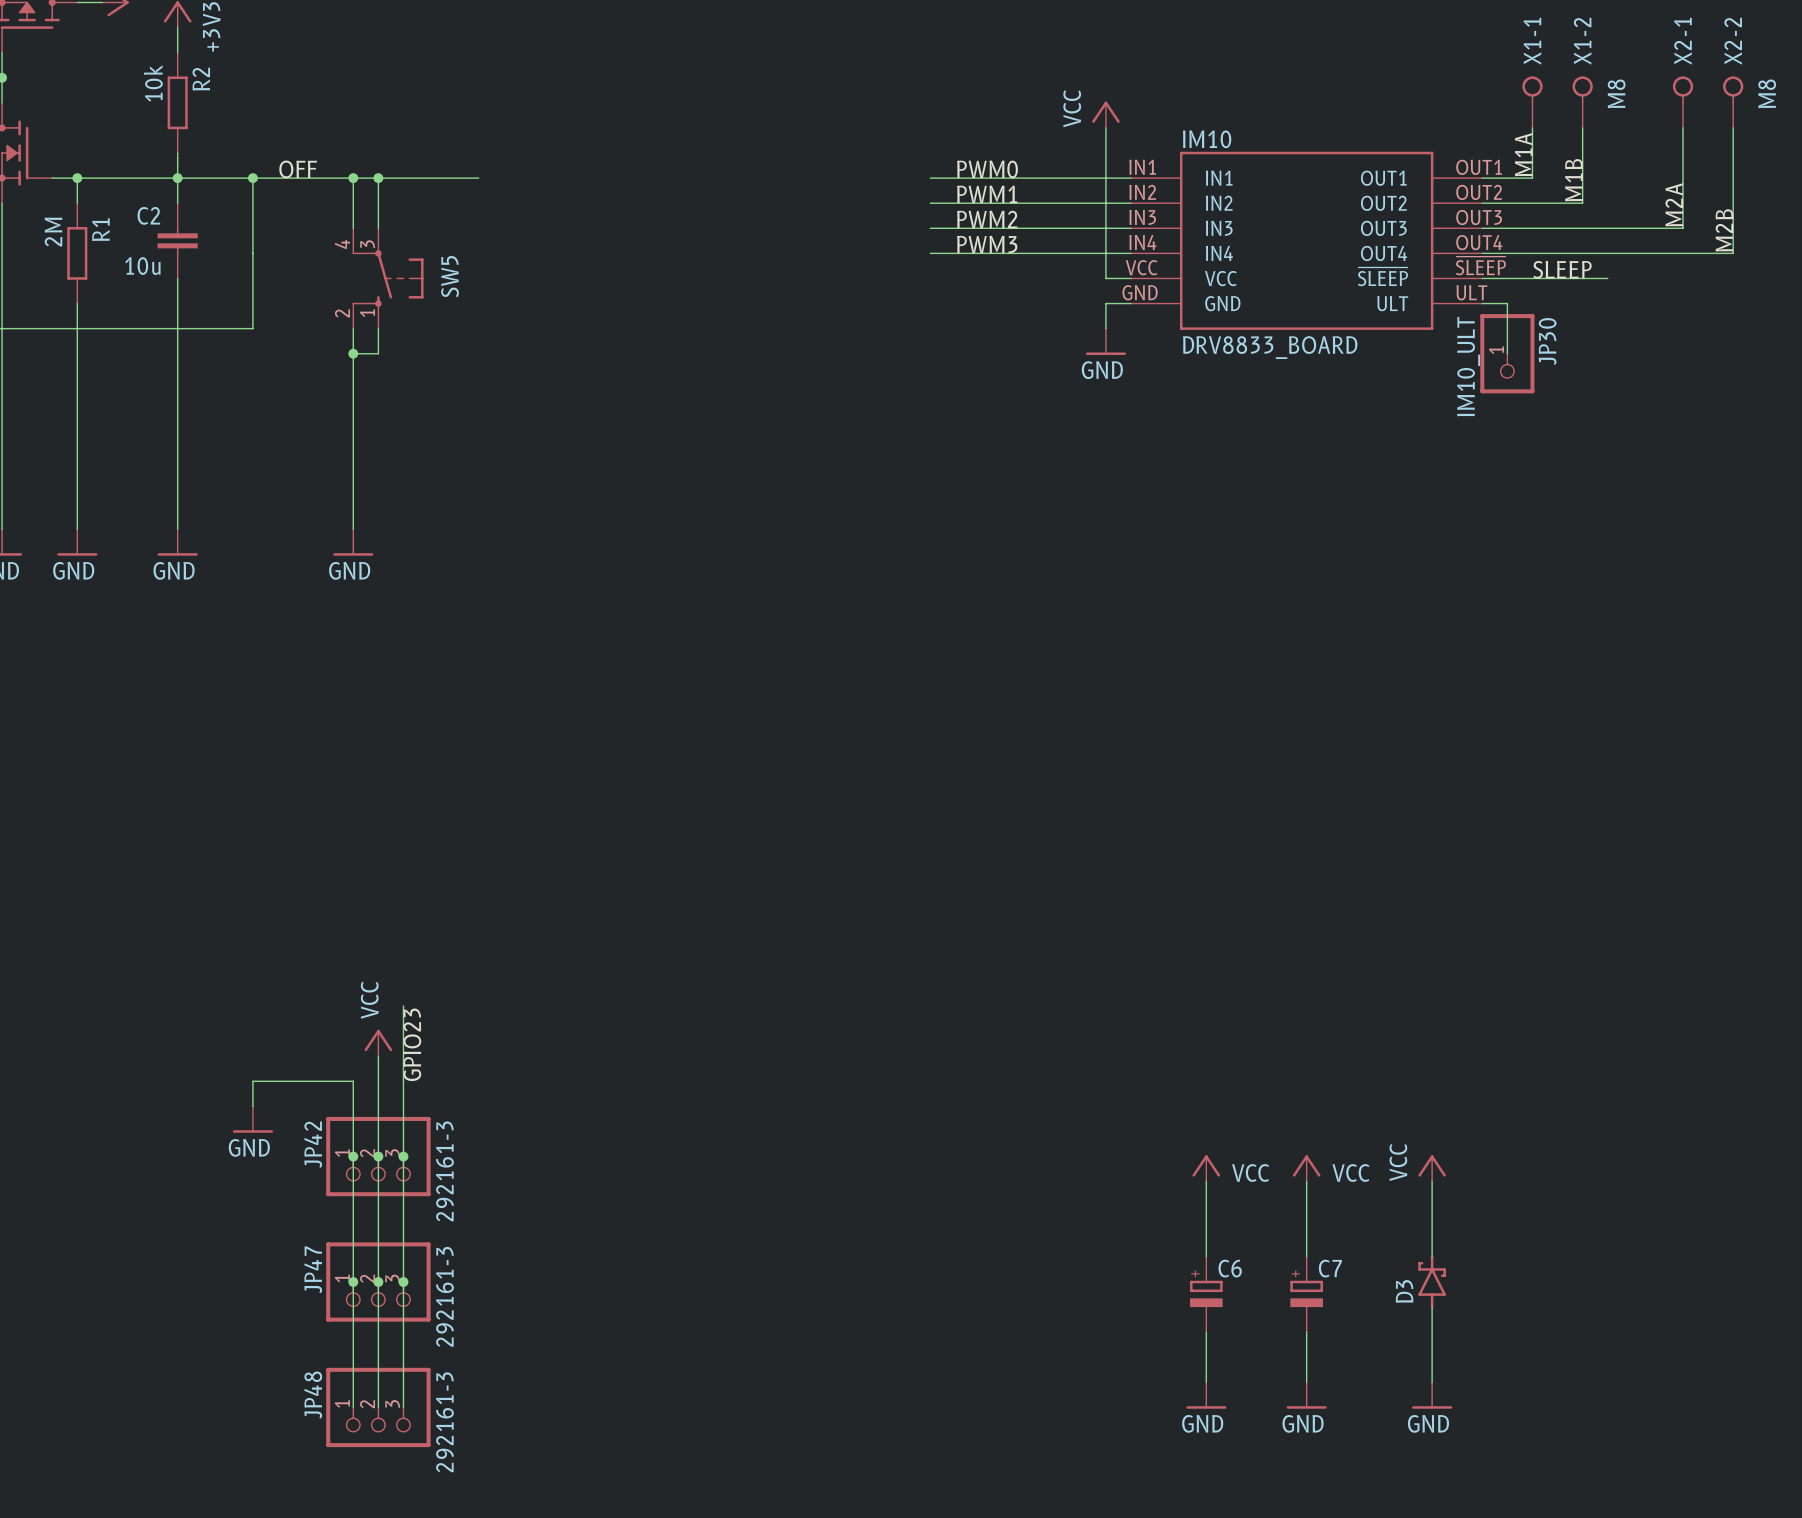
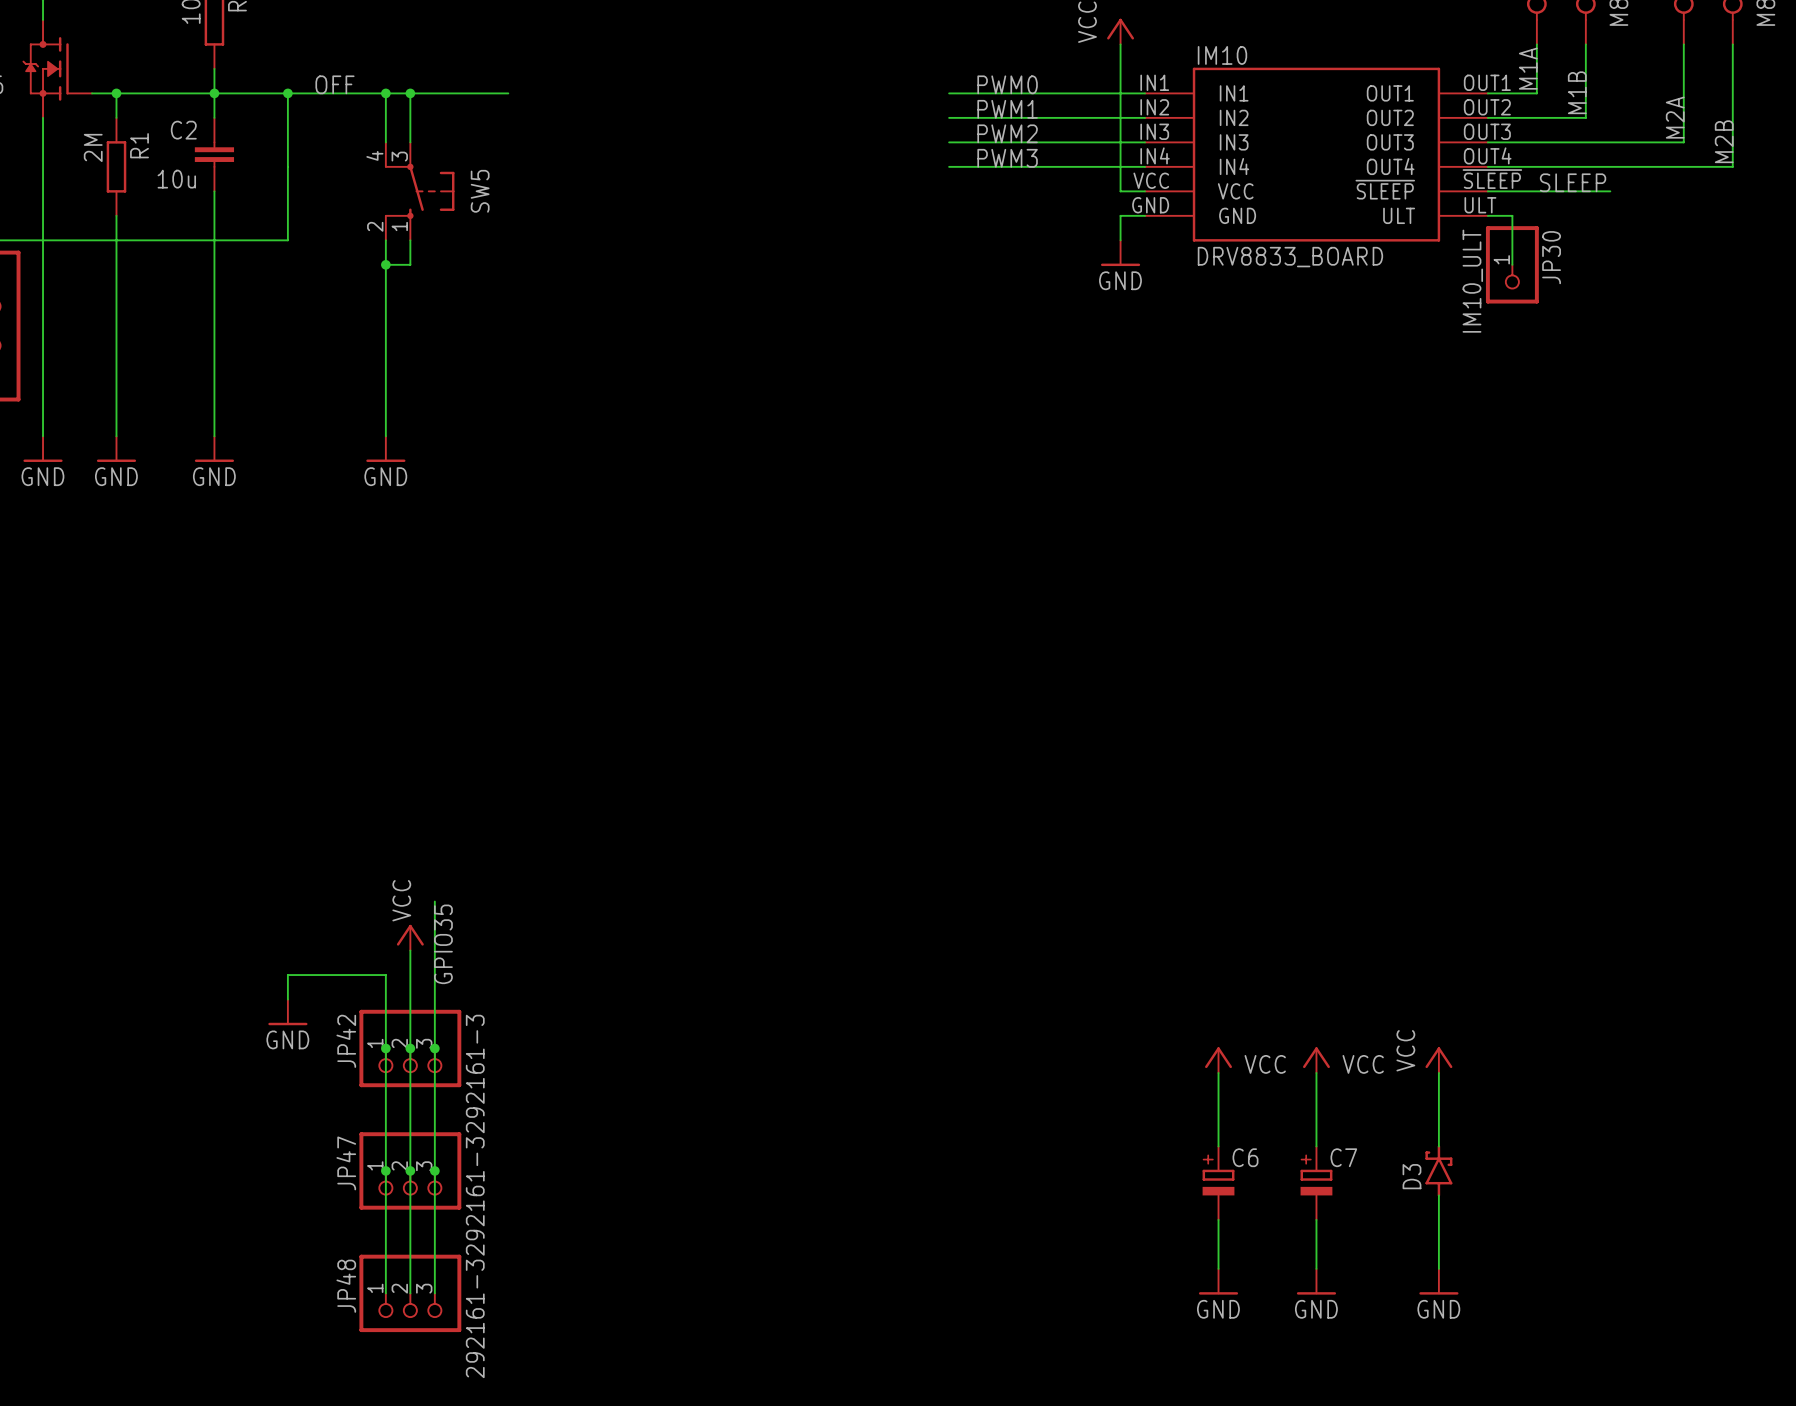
label: GPIO23 (412, 1044) -> GPIO35 (443, 944)

